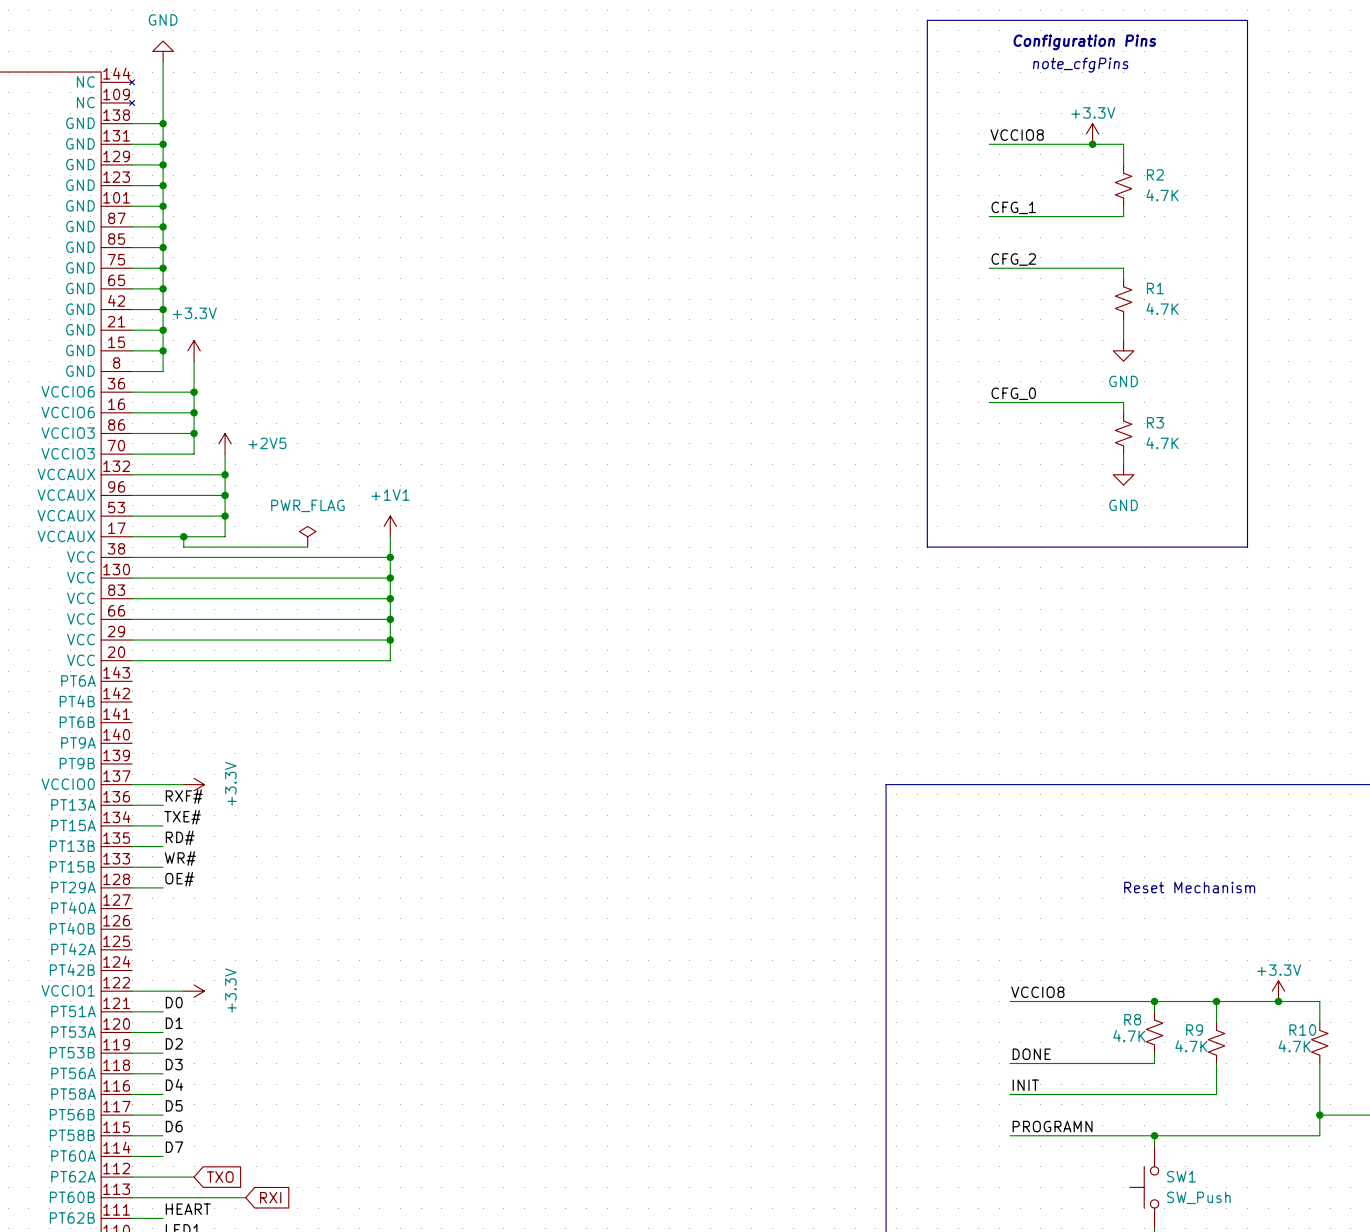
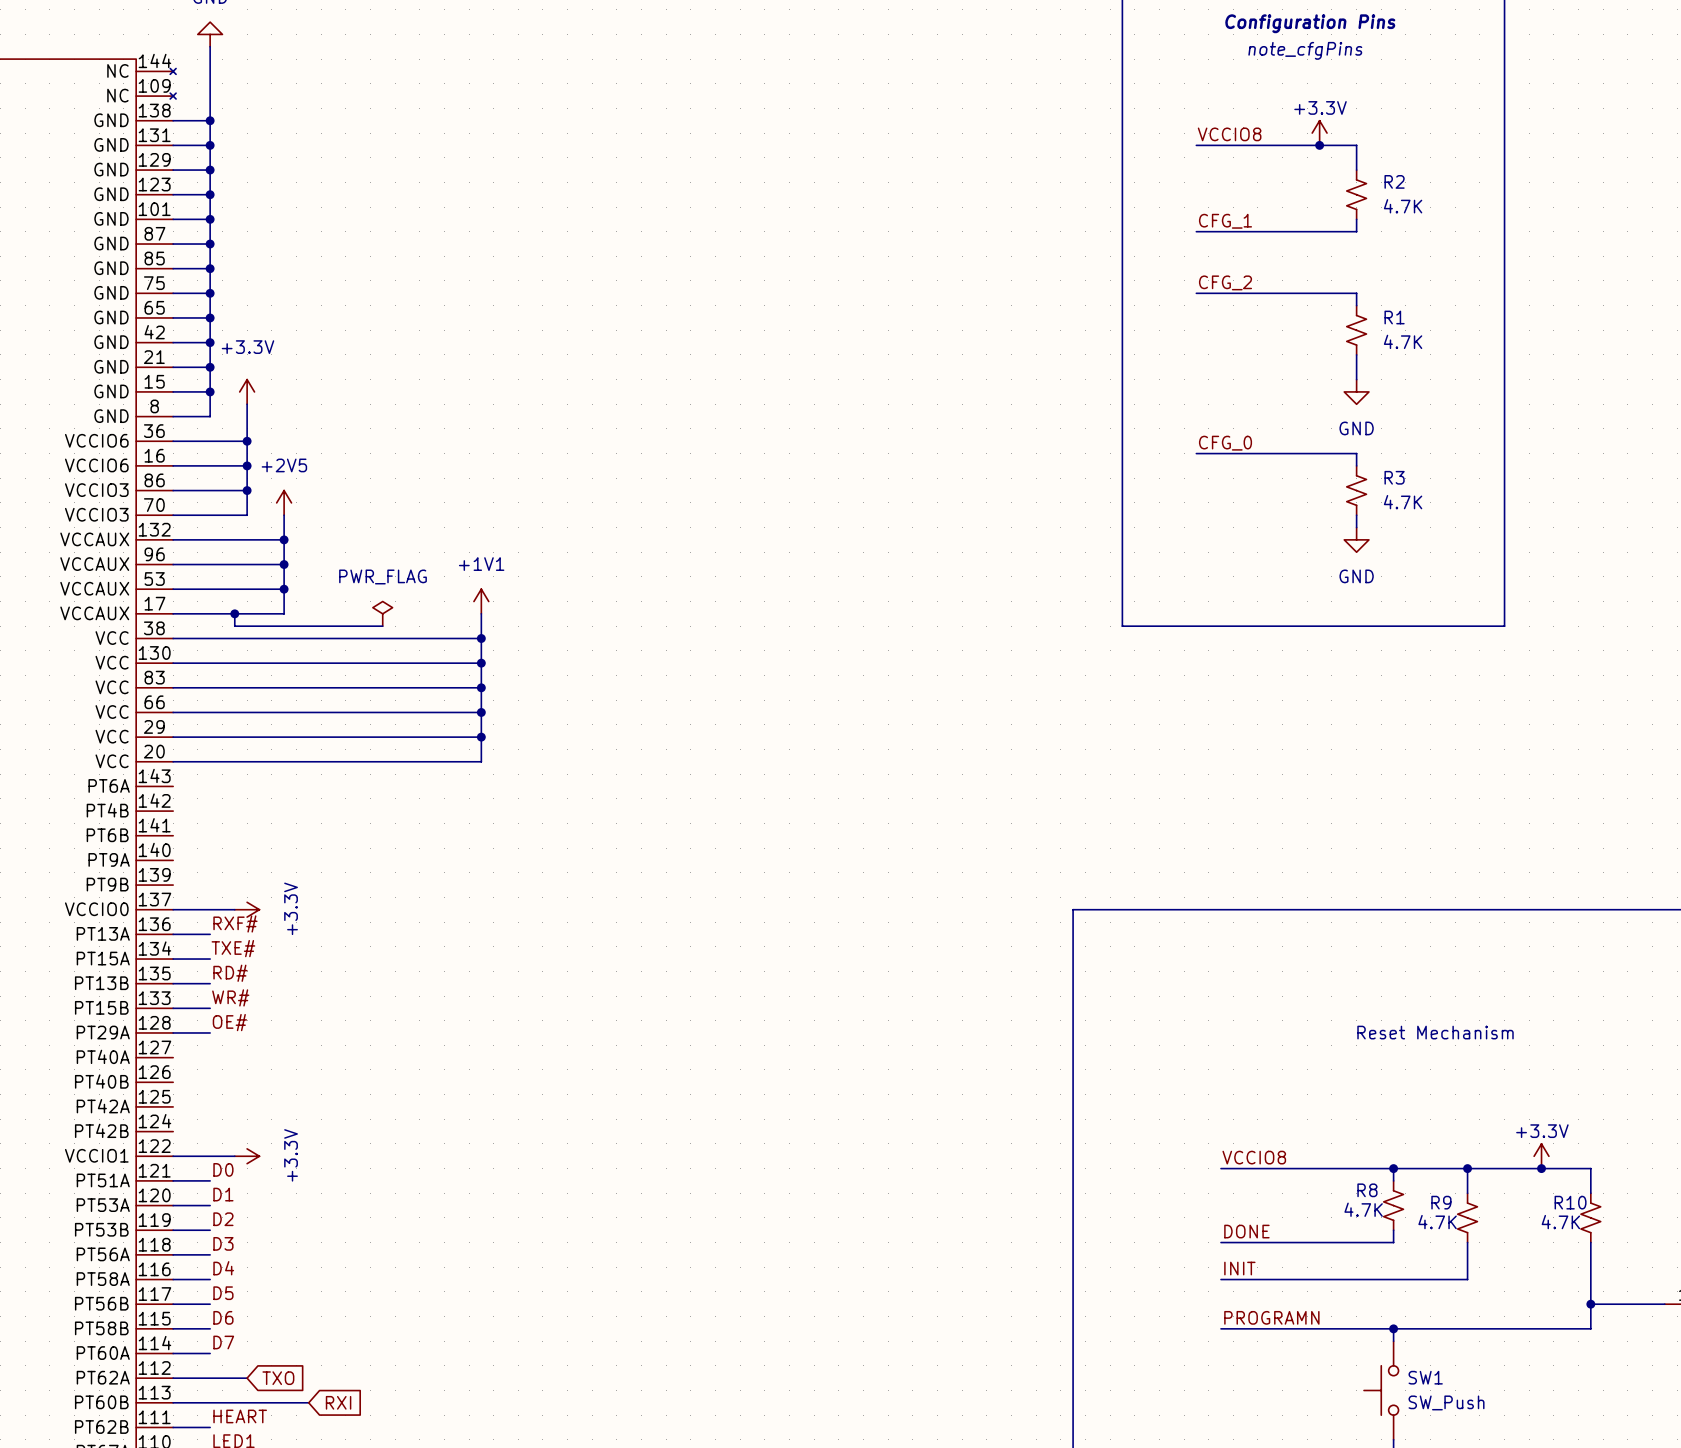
power symbol text position: +2V5 (267, 443) -> +2V5 (284, 465)

